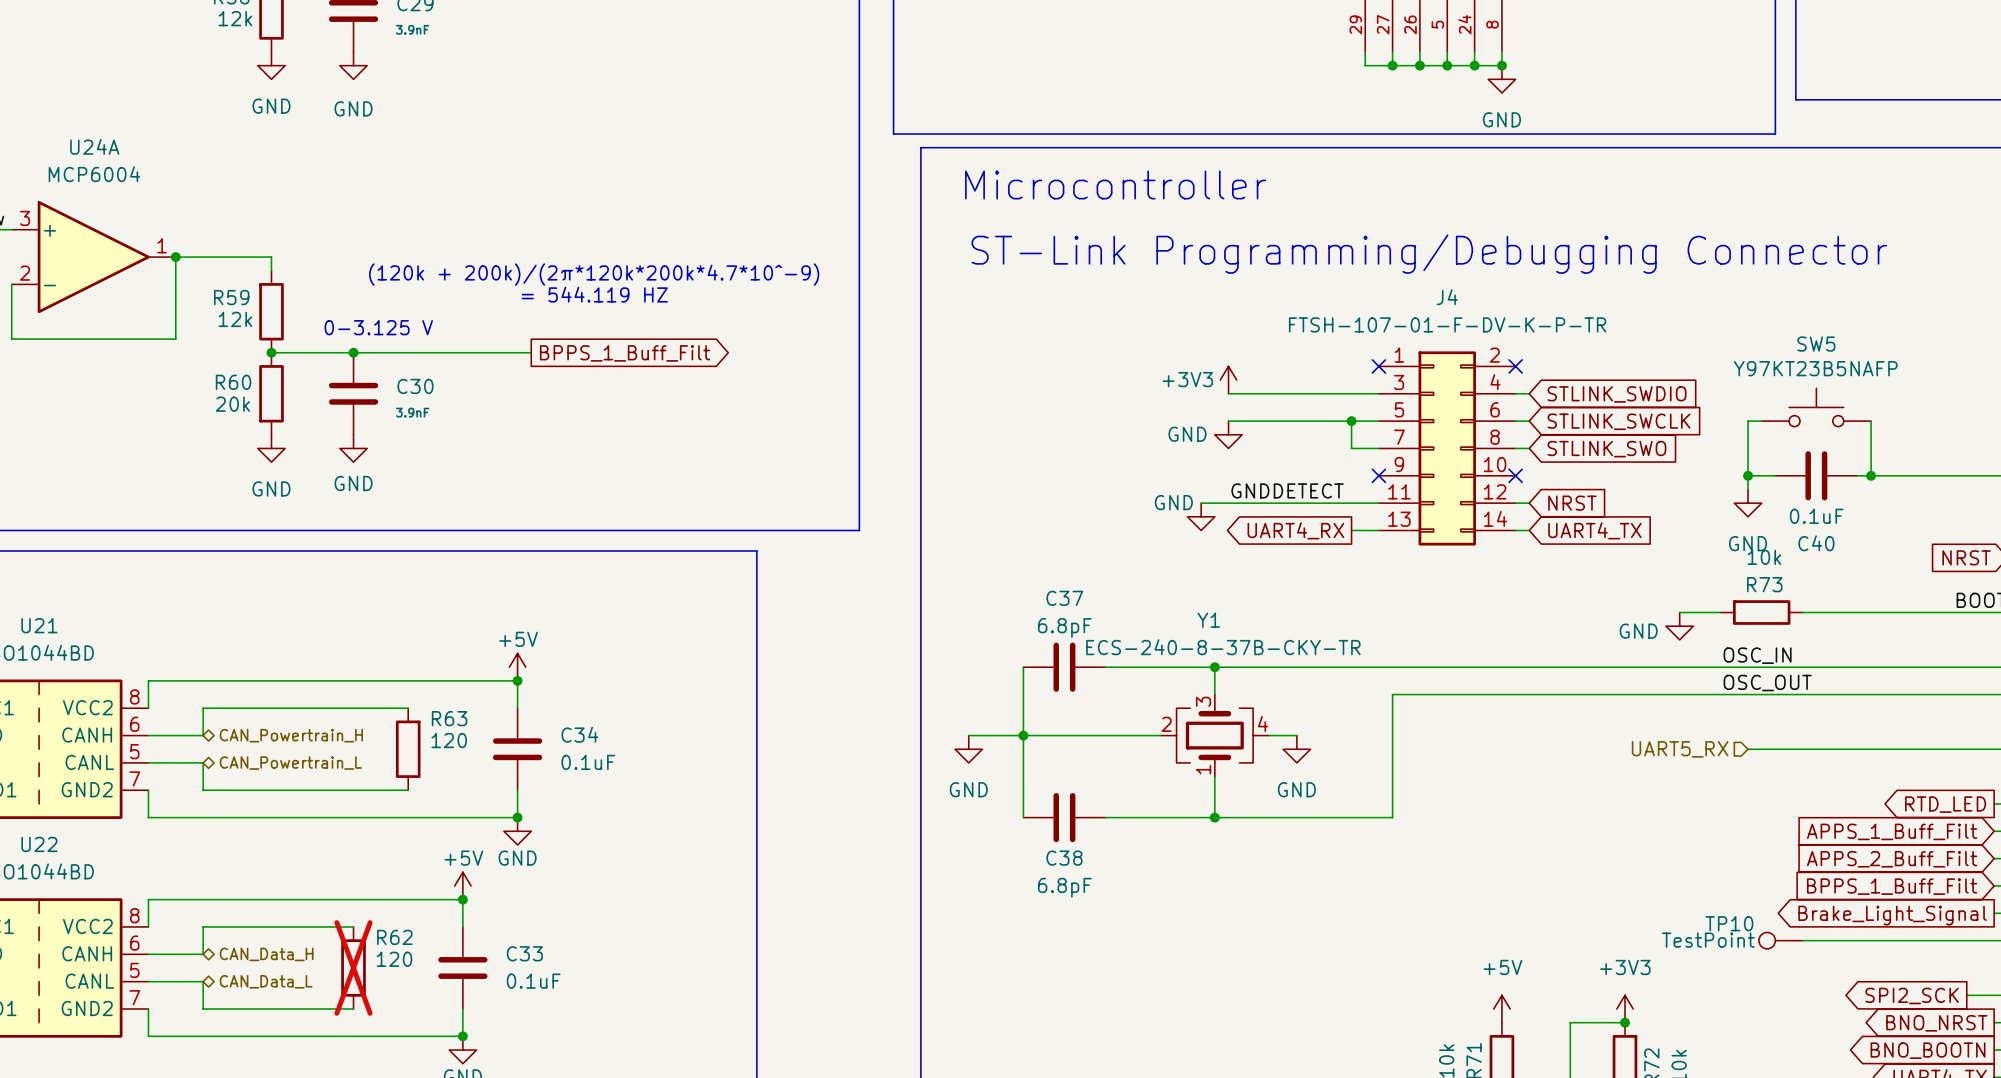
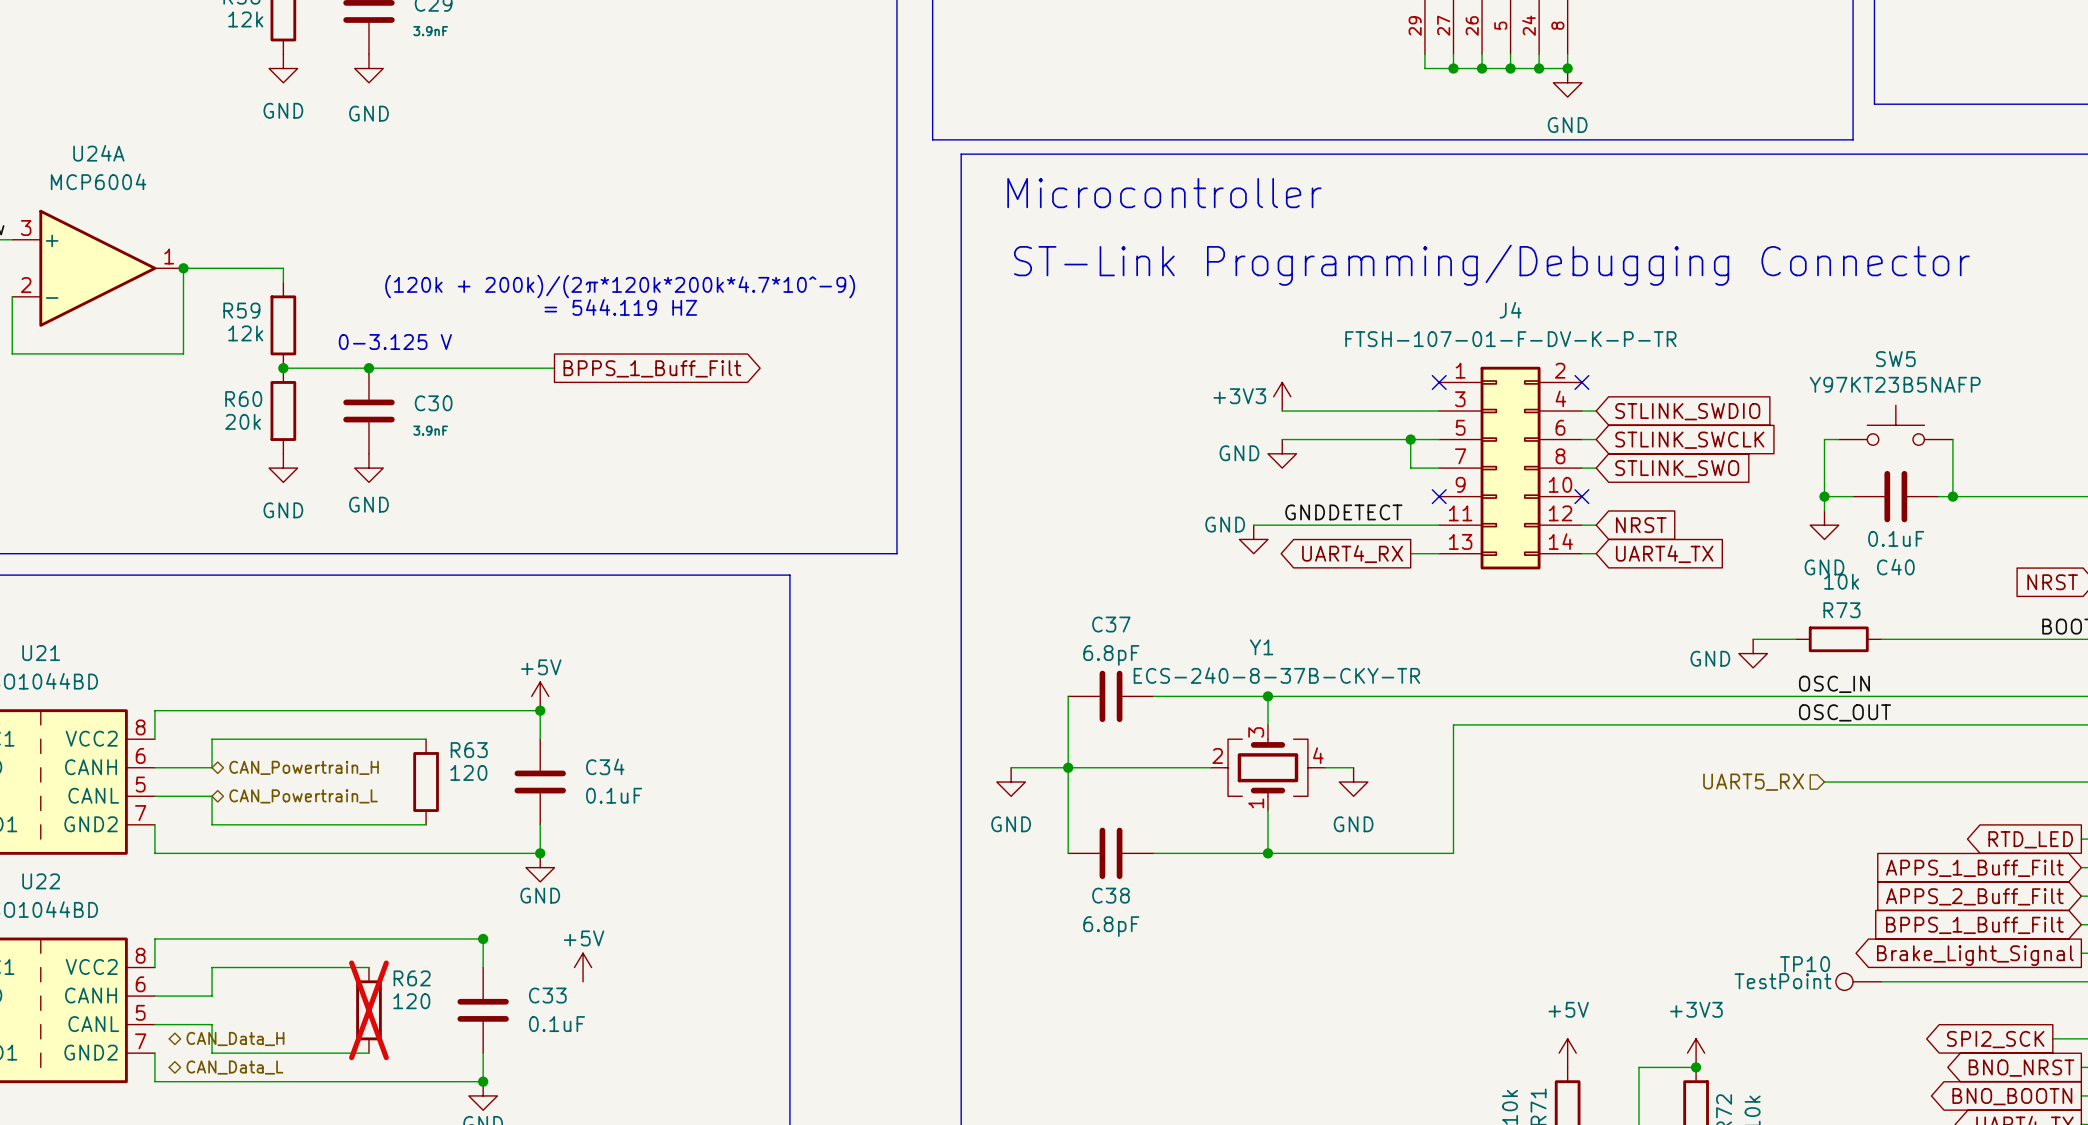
power symbol position: +5V (462, 885) -> +5V (583, 967)
hierarchical label position: CAN_Data_H (266, 954) -> CAN_Data_H (235, 1038)
hierarchical label position: CAN_Data_L (266, 981) -> CAN_Data_L (234, 1067)

